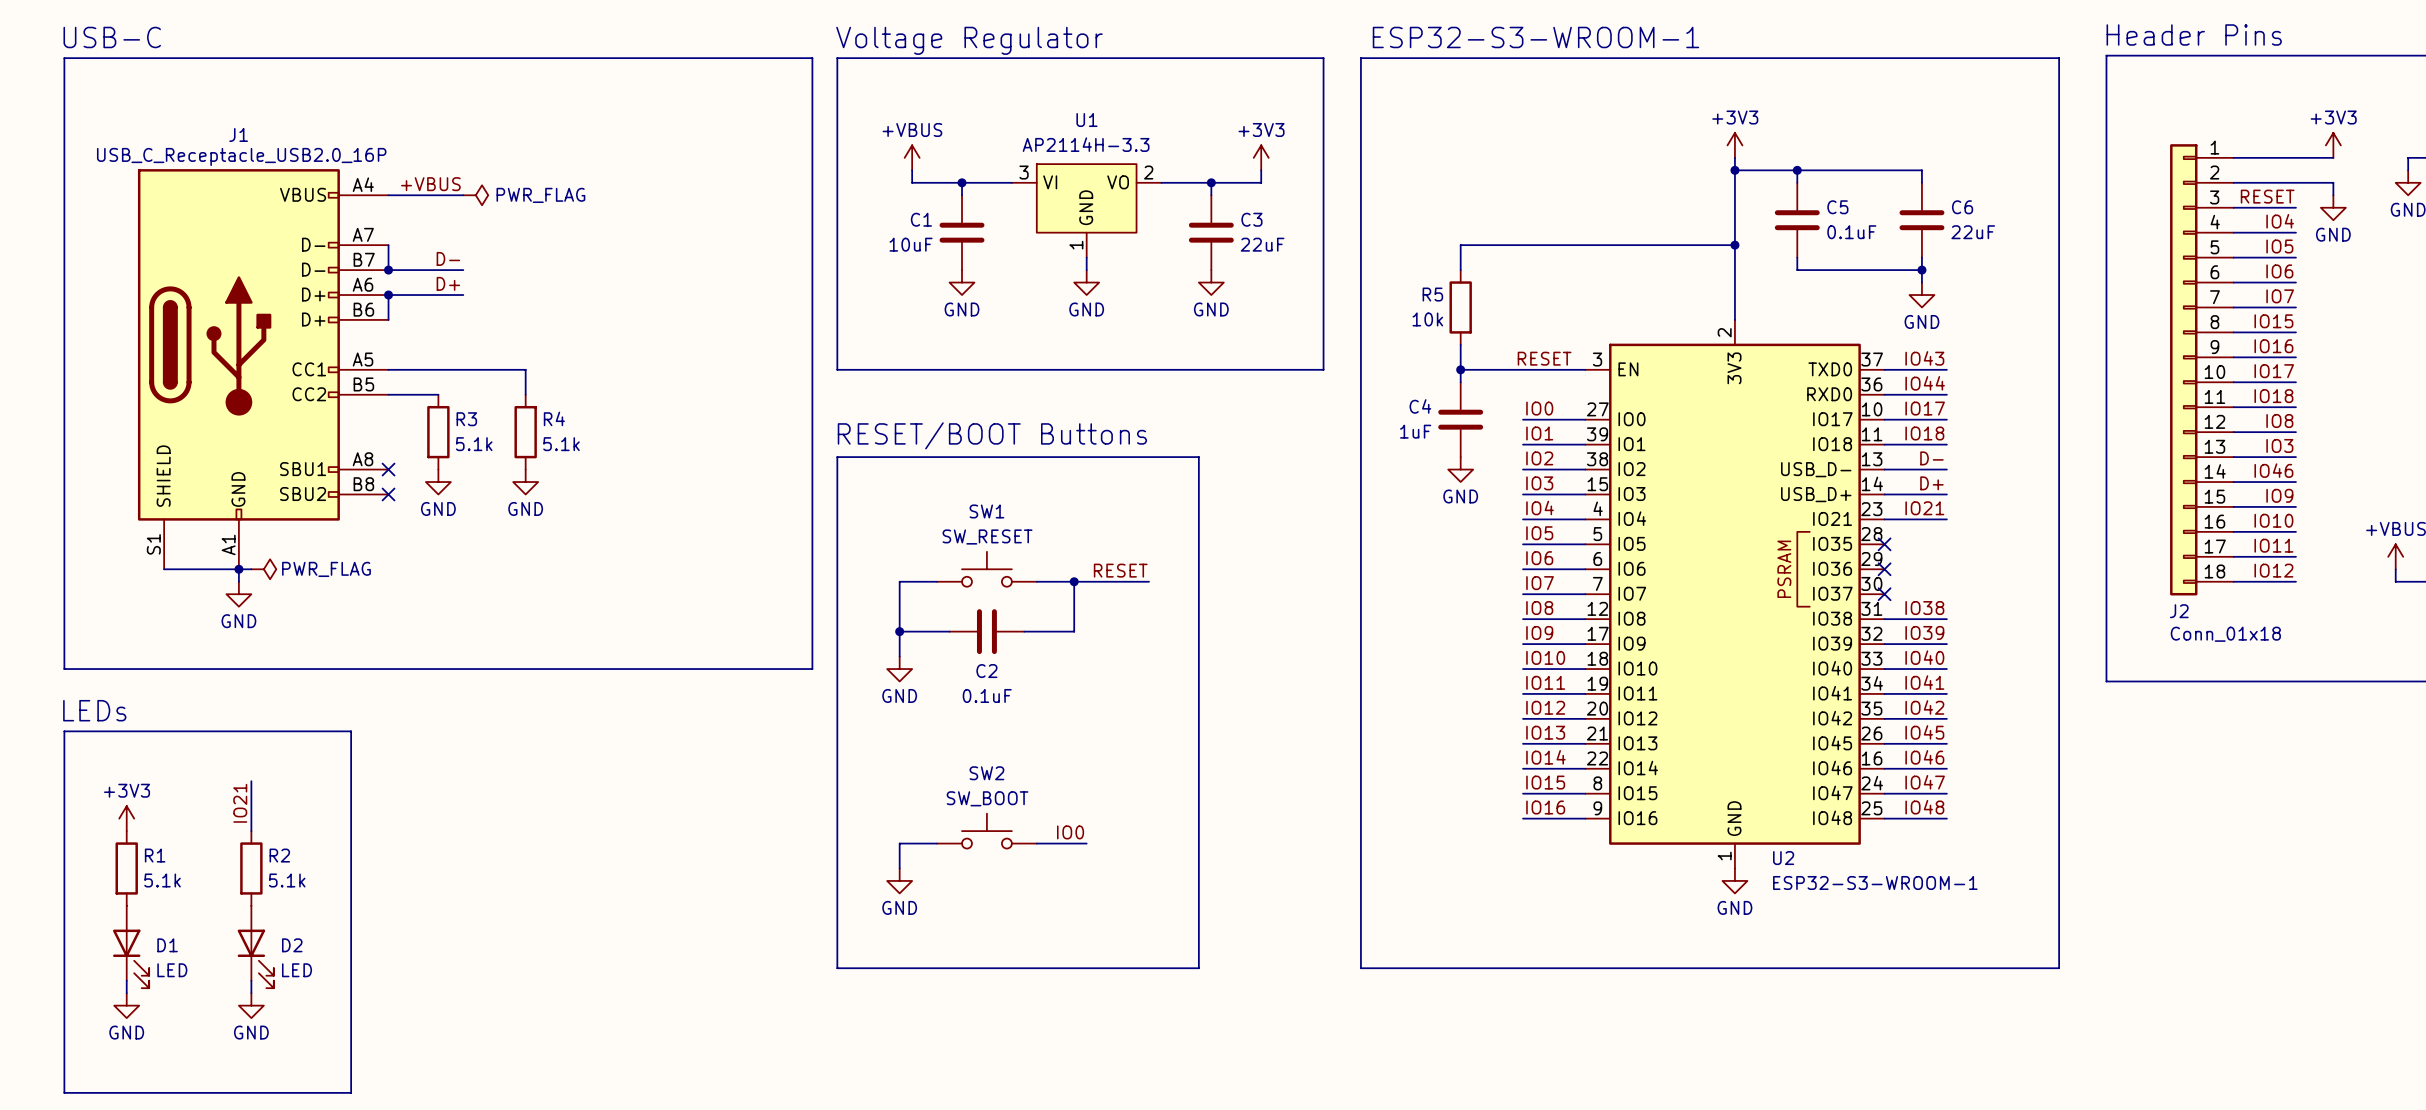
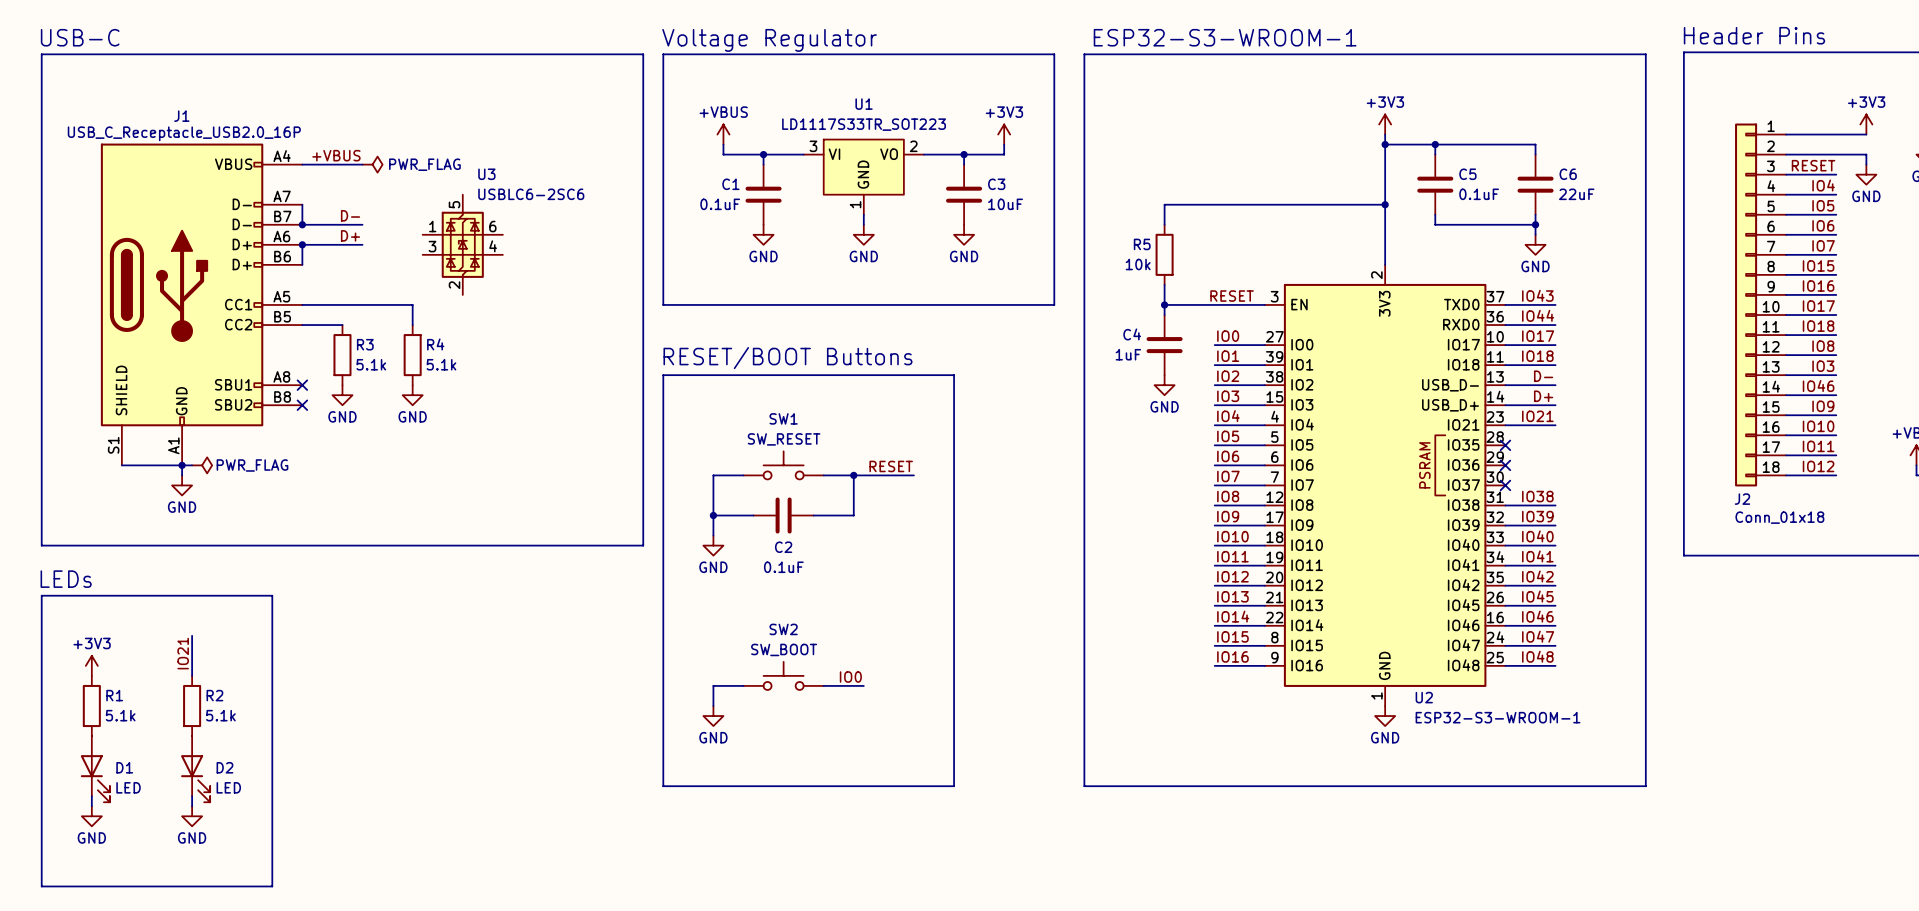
U1 value: AP2114H-3.3 (1086, 144) -> LD1117S33TR_SOT223 (864, 124)
C1 value: 10uF (911, 244) -> 0.1uF (720, 204)
C3 value: 22uF (1262, 244) -> 10uF (1005, 204)
U3: none -> USBLC6-2SC6 (462, 244)

